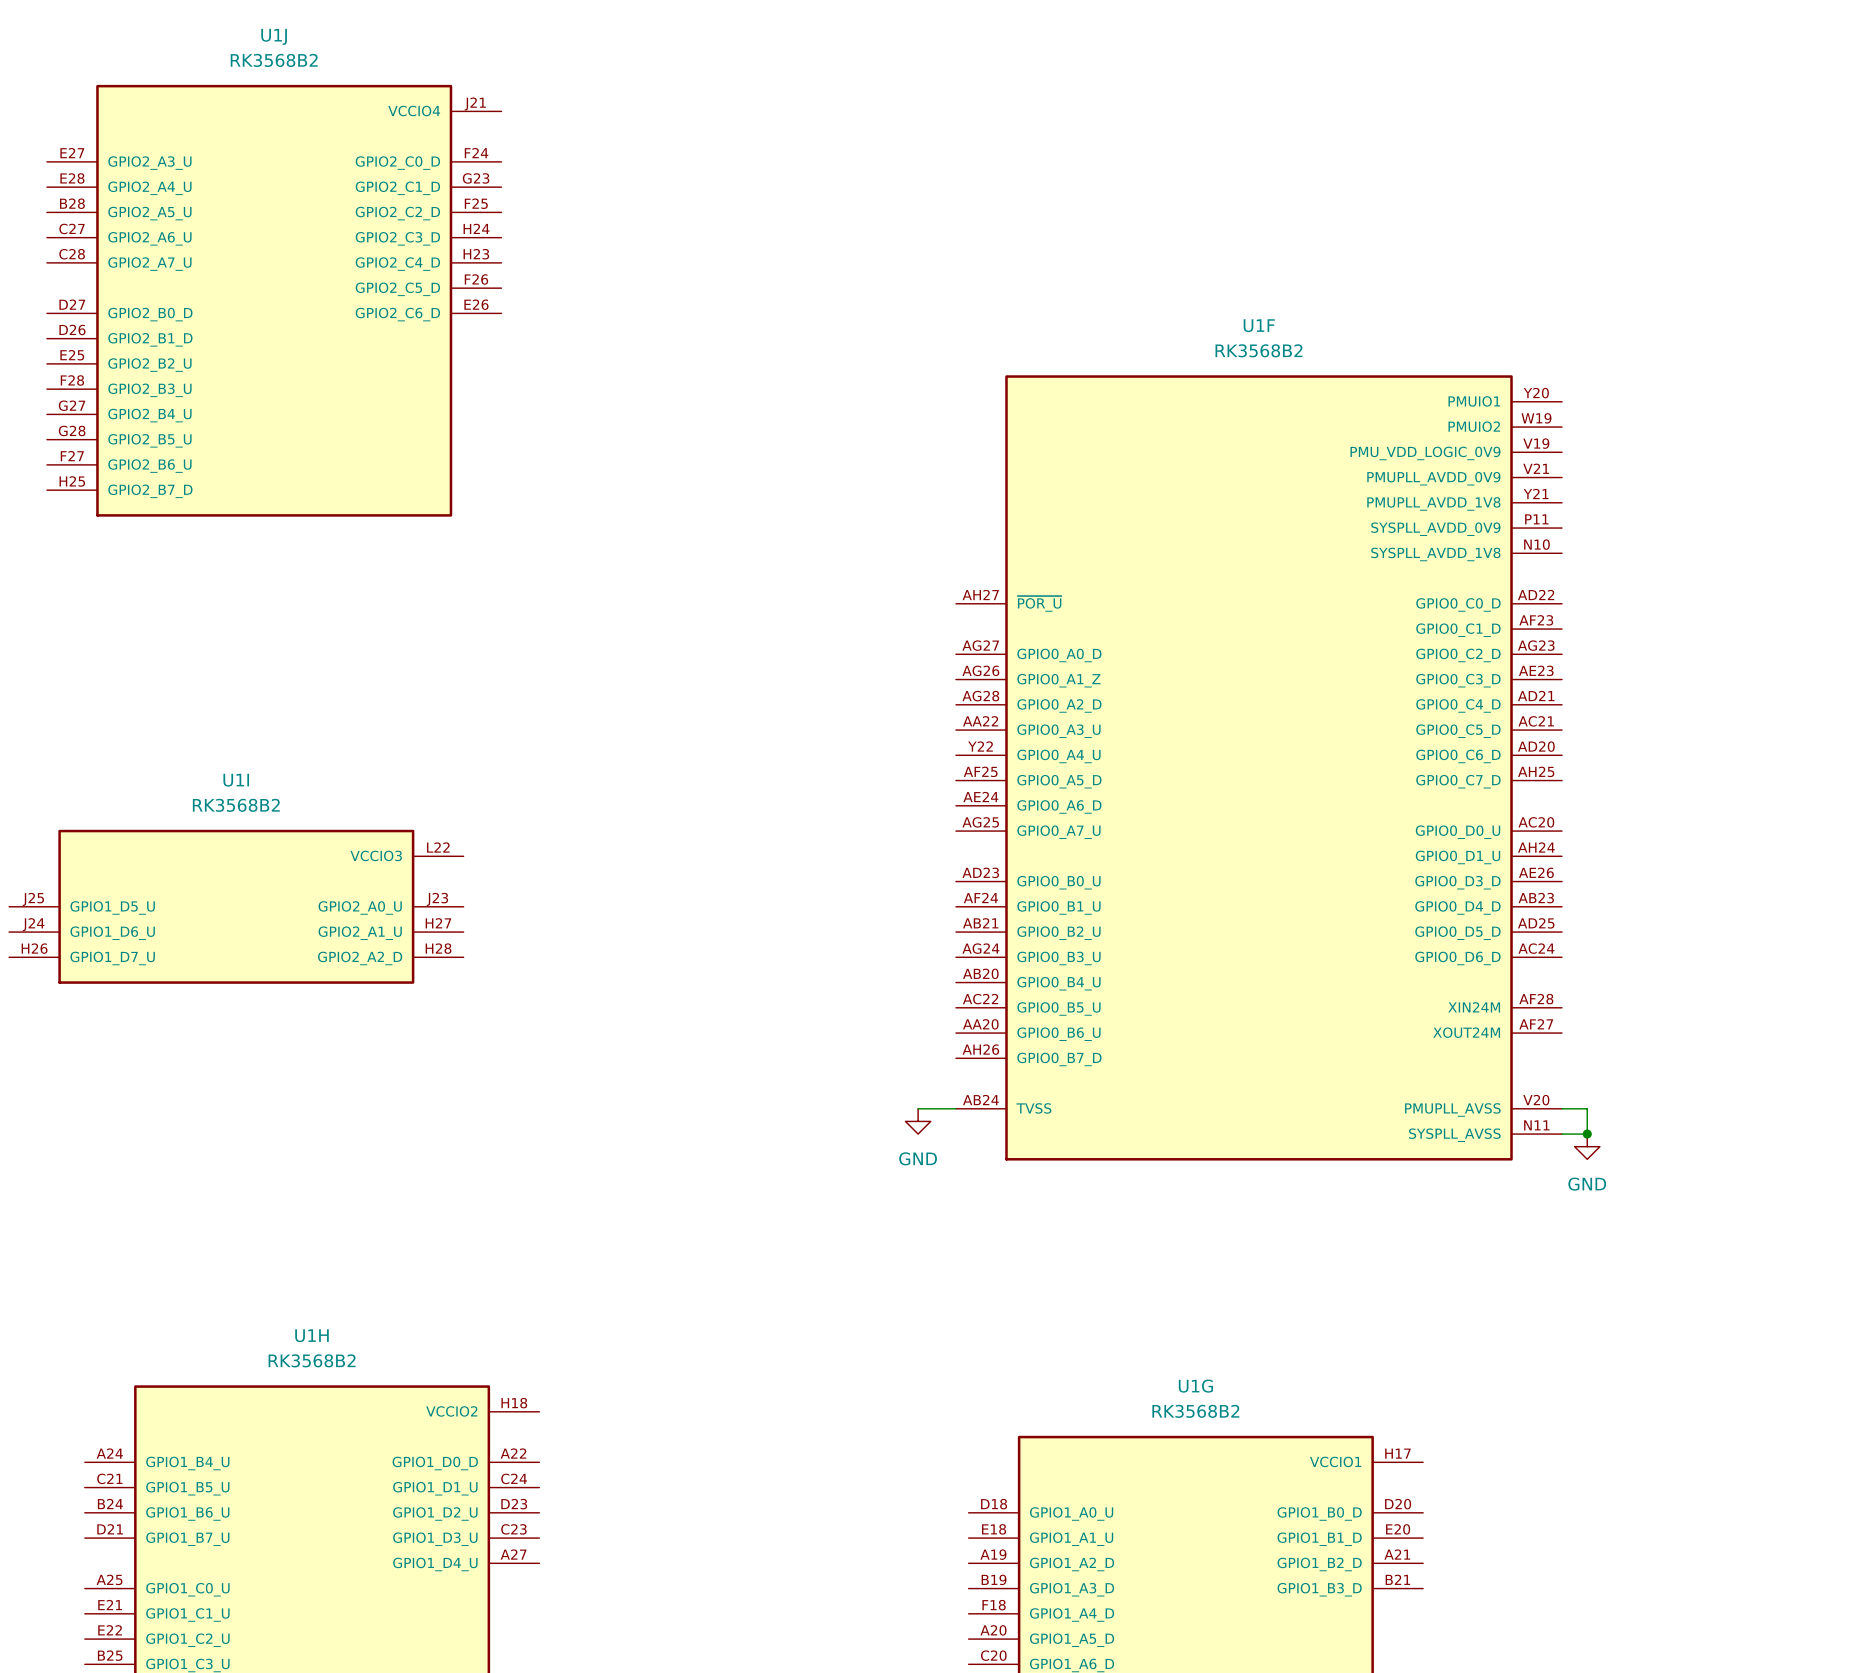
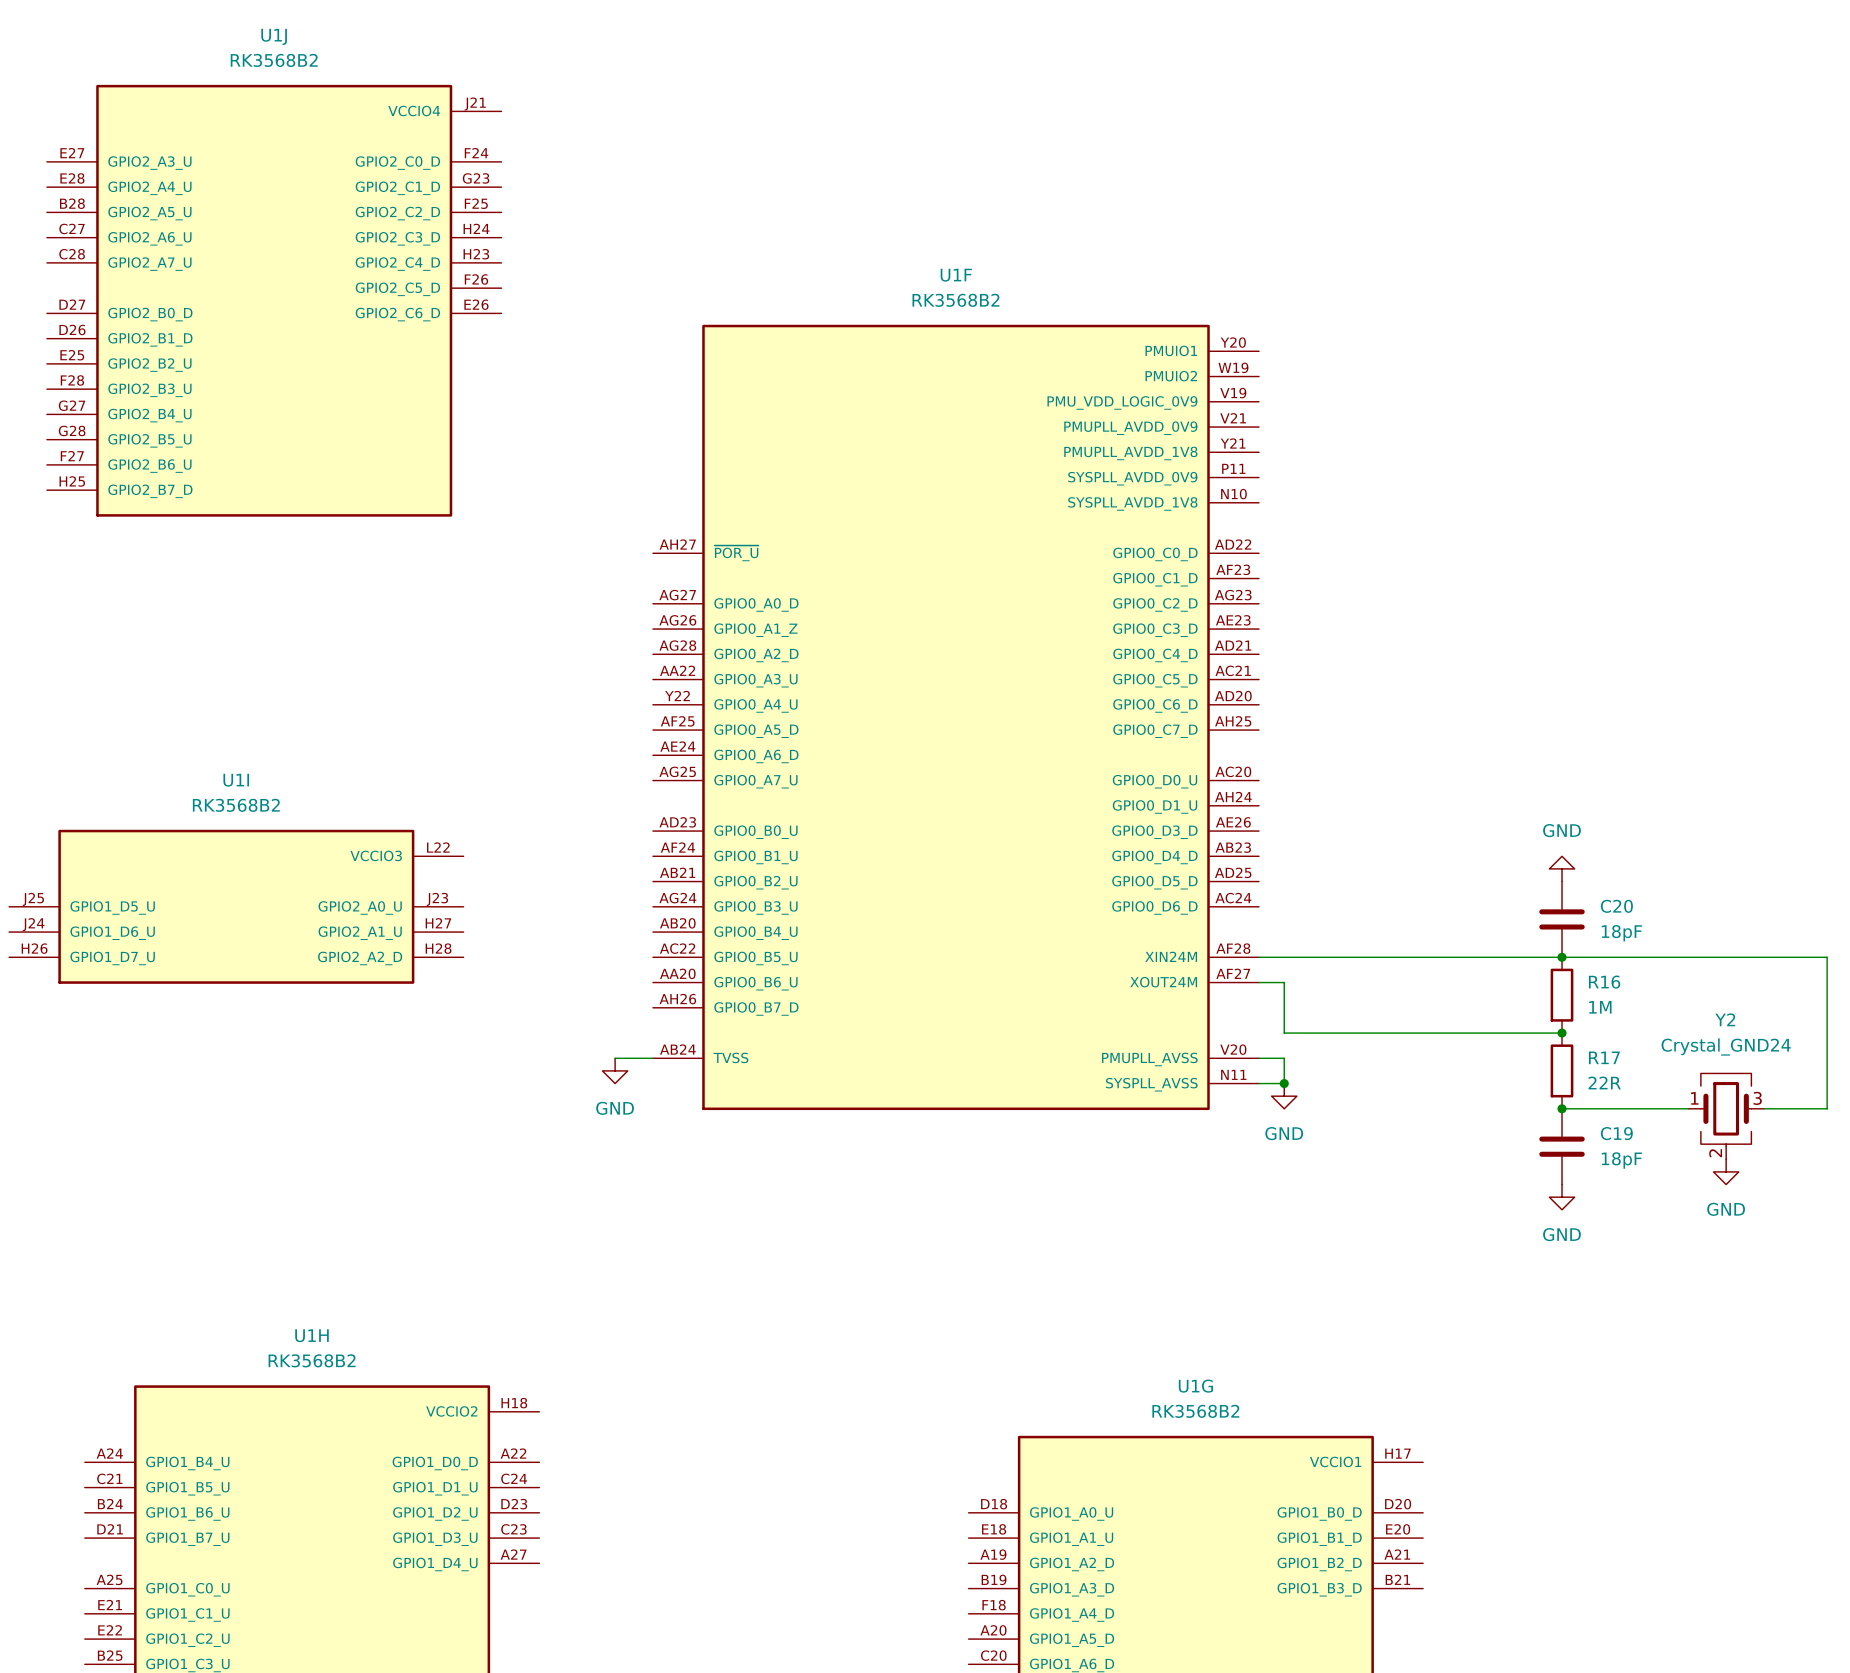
U1F position: (1259, 767) -> (955, 717)
power symbol: none -> GND (1562, 868)
C20: none -> 18pF (1562, 919)
wire: none -> (1259, 957) (1827, 957) (1827, 1108) (1764, 1108)
junction: none -> (1562, 957)
R16: none -> 1M (1562, 995)
junction: none -> (1562, 1033)
wire: none -> (615, 1058) (652, 1058)
power symbol: none -> GND (615, 1070)
R17: none -> 22R (1562, 1070)
junction: none -> (1284, 1083)
power symbol: none -> GND (1284, 1096)
wire: (1587, 1108) (1587, 1134) (1562, 1134) -> (1587, 1108) (1688, 1108)
Y2: none -> Crystal_GND24 (1726, 1116)
power symbol: GND (918, 1121) -> none
junction position: (1587, 1134) -> (1562, 1108)
C19: none -> 18pF (1562, 1146)
power symbol position: GND (1587, 1146) -> GND (1562, 1197)
power symbol: none -> GND (1726, 1171)

